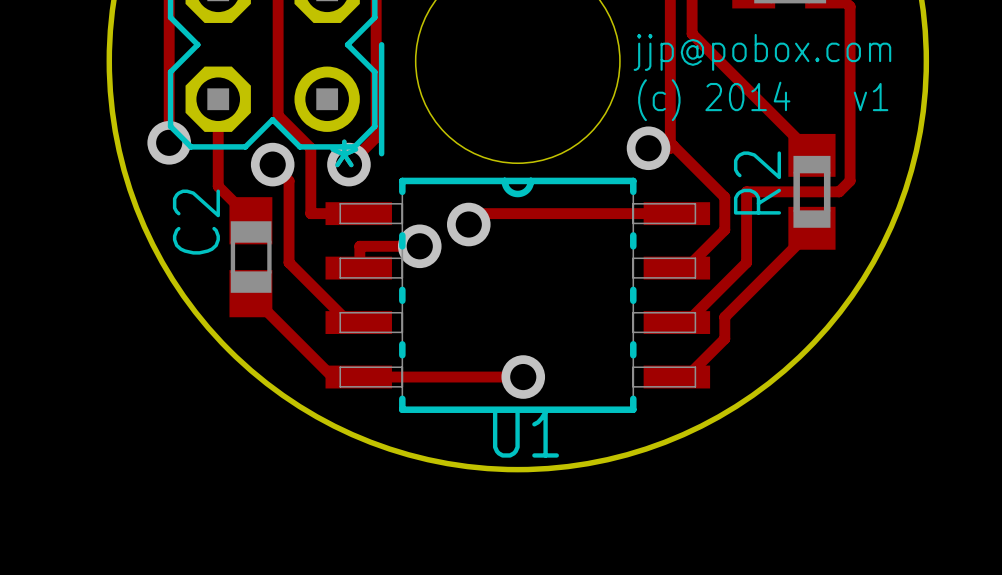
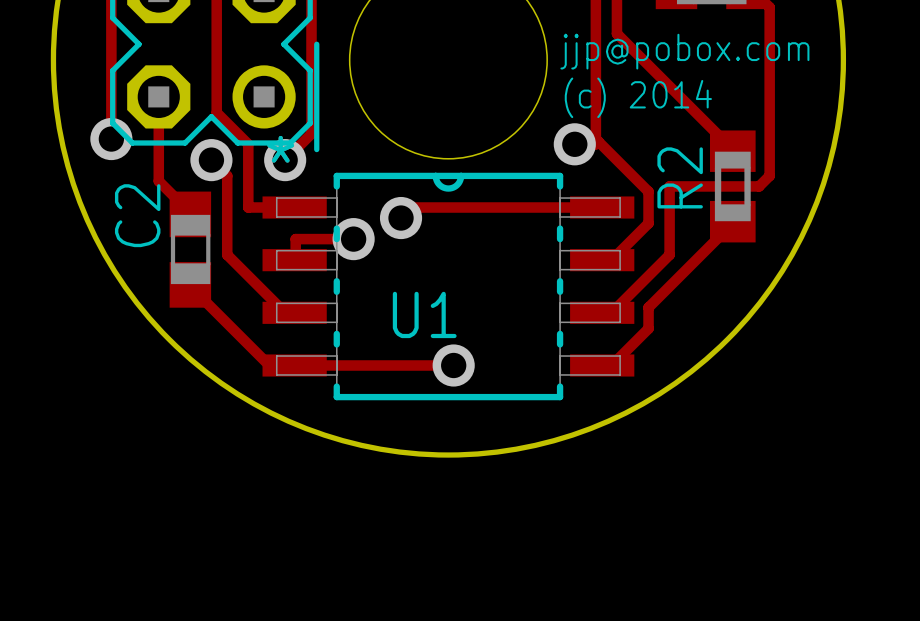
text: v1 (871, 97) -> none
U1 name position: U1 (525, 433) -> U1 (424, 314)

